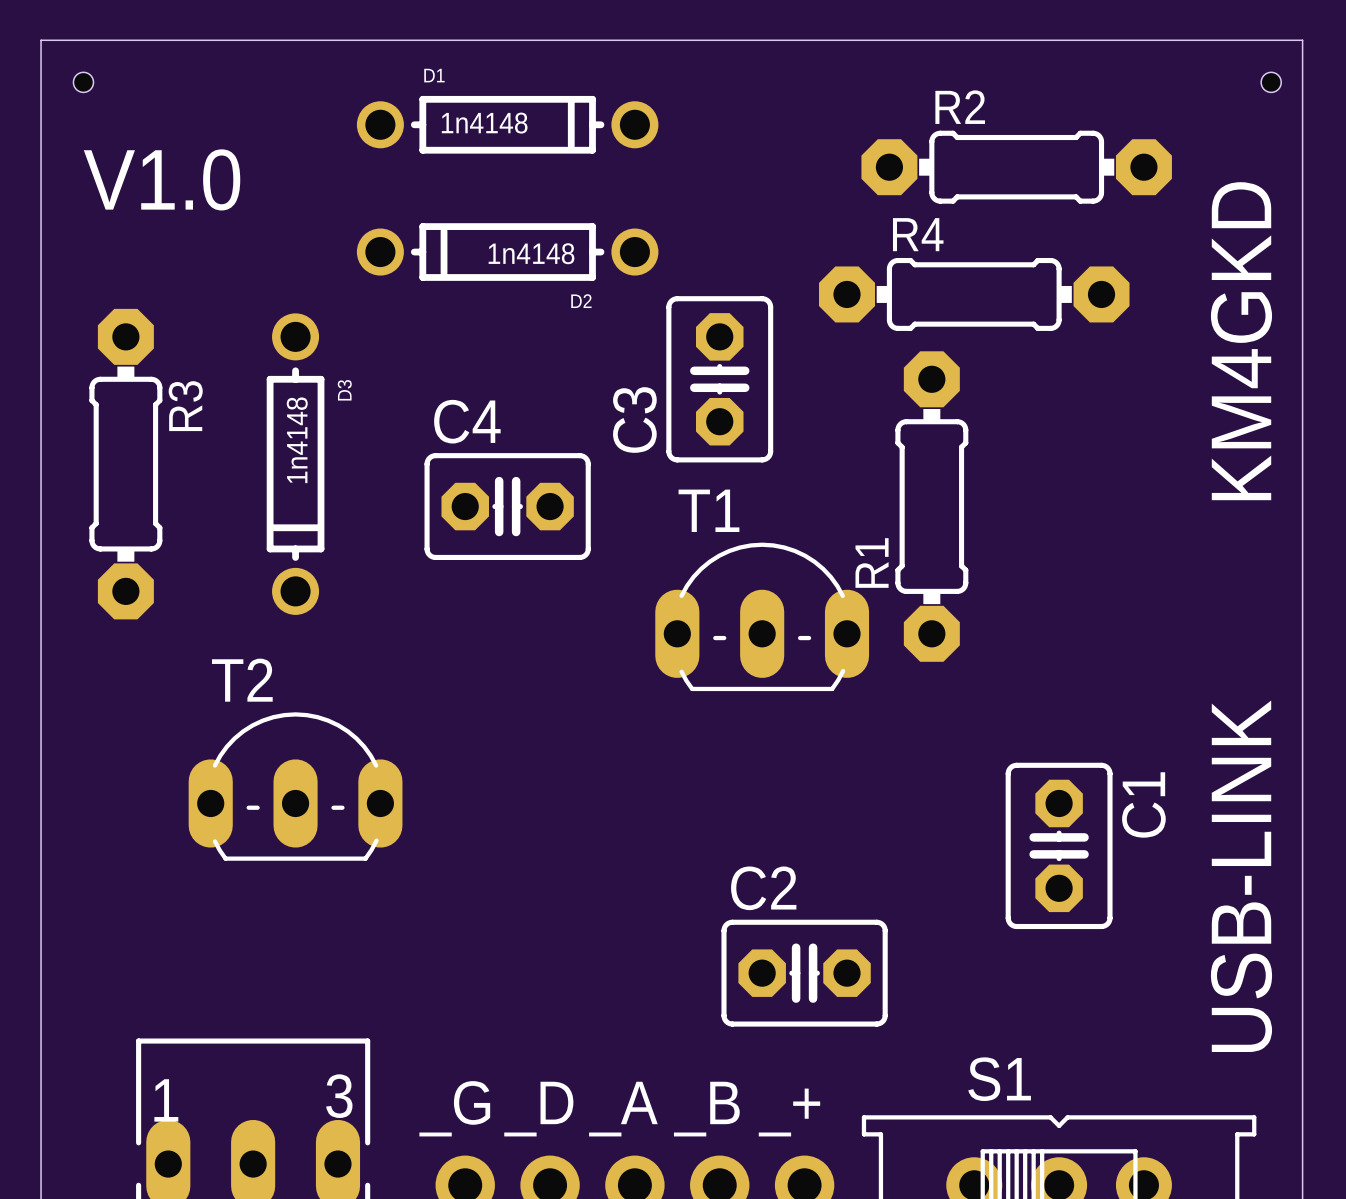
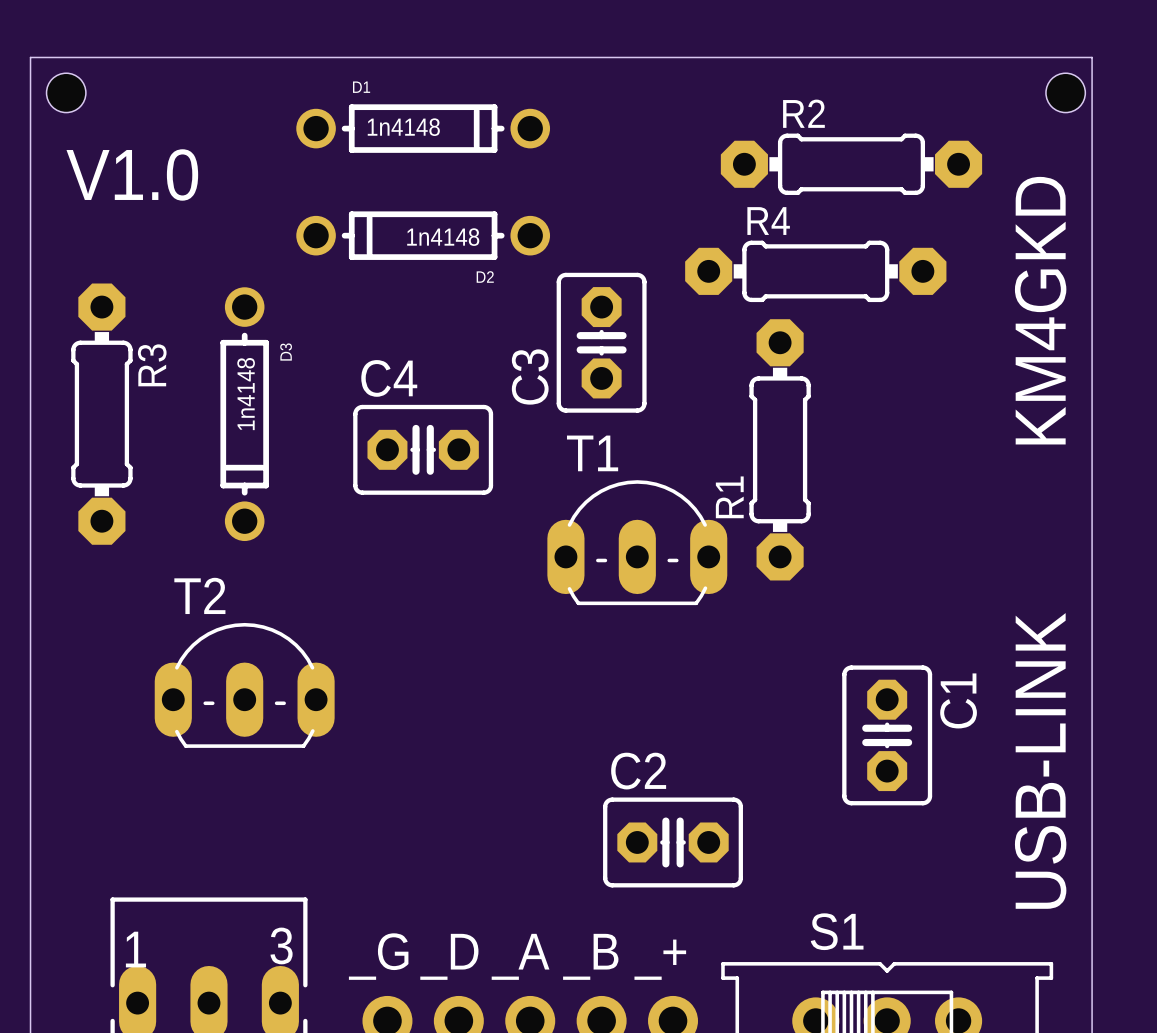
hole size: [73, 72, 94, 93] -> [46, 73, 86, 113]
hole size: [1261, 72, 1282, 93] -> [1045, 73, 1086, 113]

